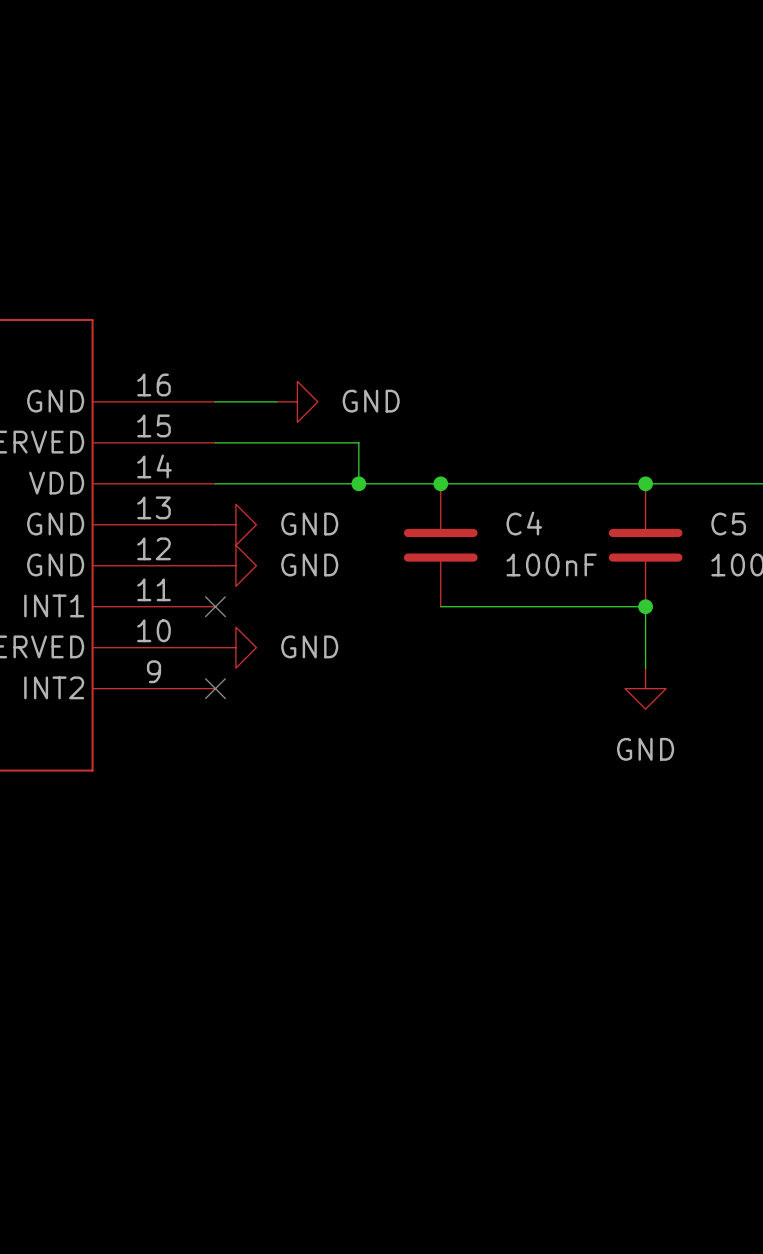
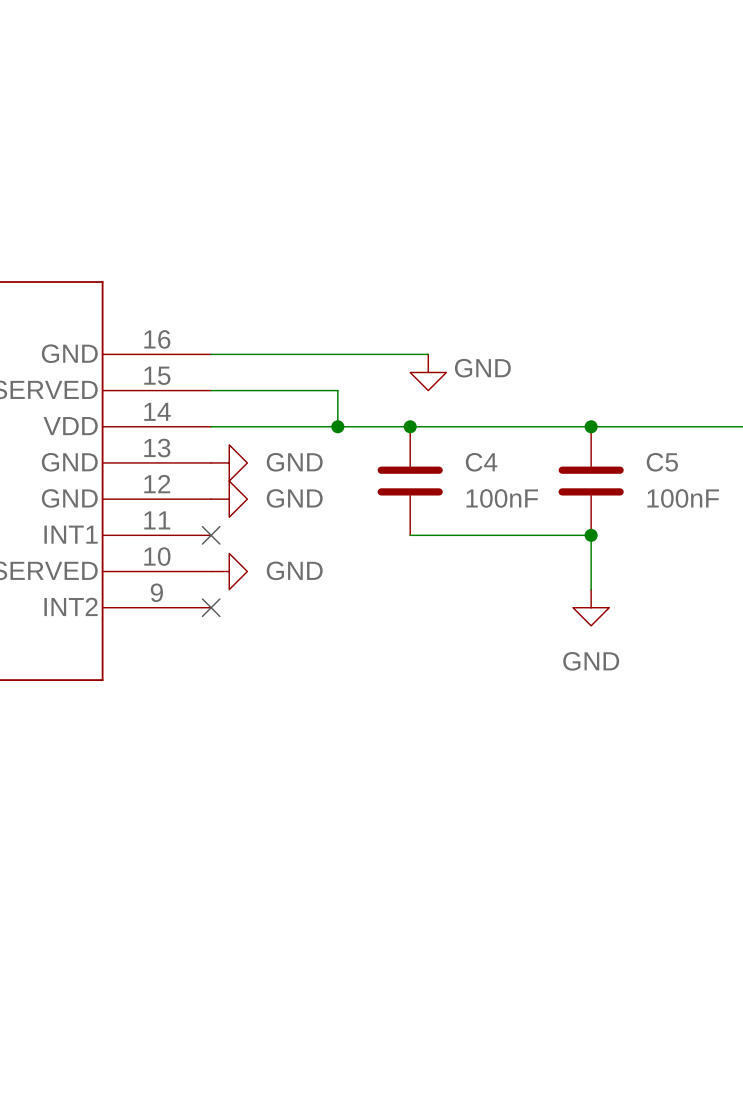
wire: none -> (265, 354) (428, 354)
power symbol rotation: 0° (297, 401) -> 90° clockwise (428, 372)
power symbol position: GND (297, 401) -> GND (428, 372)

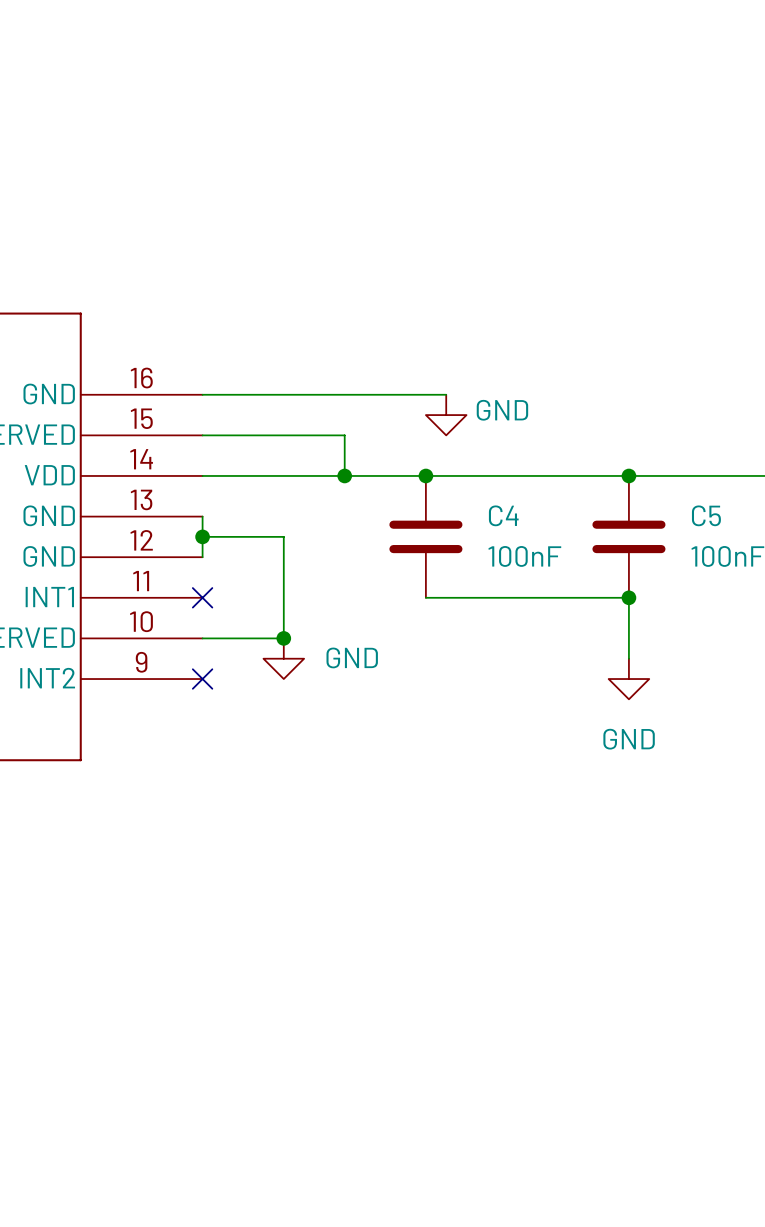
wire: none -> (202, 516) (202, 557)
power symbol: GND (229, 462) -> none
wire: none -> (202, 536) (283, 536) (283, 638) (202, 638)
junction: none -> (202, 536)
power symbol: GND (229, 499) -> none
power symbol: GND (229, 571) -> none
junction: none -> (283, 638)
power symbol: none -> GND (283, 658)

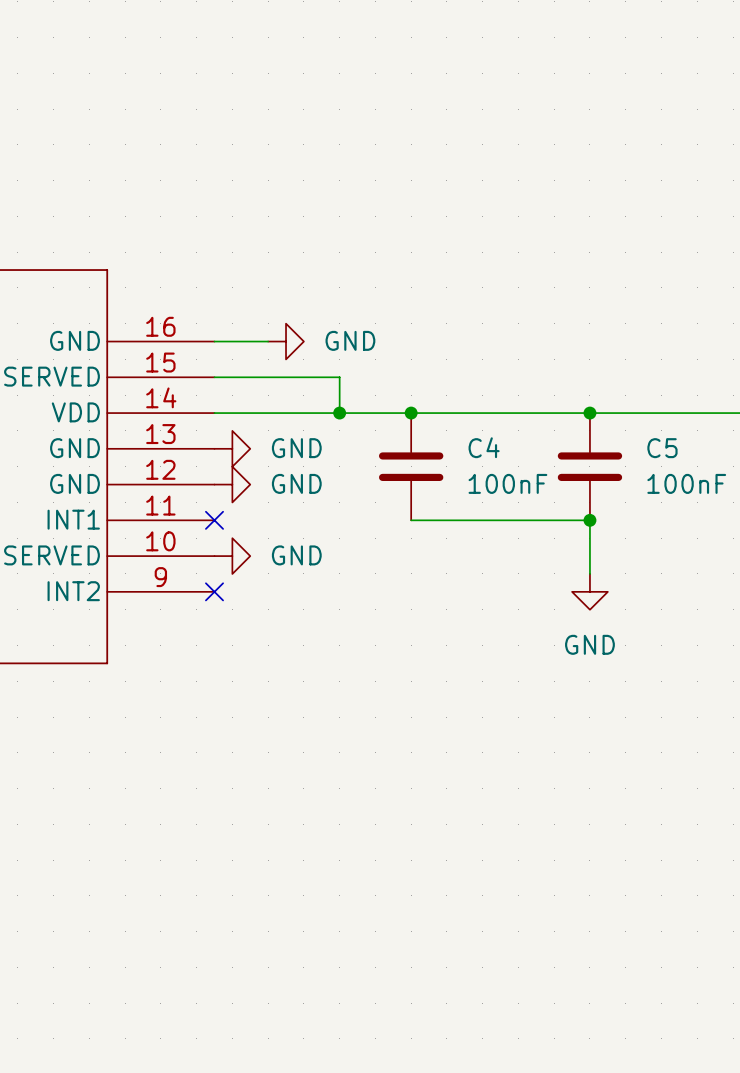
wire: (263, 394) (446, 394) -> none
power symbol: none -> GND (286, 341)
power symbol: GND (446, 415) -> none
wire: (202, 516) (202, 557) -> none
power symbol: none -> GND (232, 448)
wire: (202, 536) (283, 536) (283, 638) (202, 638) -> none
junction: (202, 536) -> none
power symbol: none -> GND (232, 484)
power symbol: none -> GND (232, 556)
junction: (283, 638) -> none
power symbol: GND (283, 658) -> none

